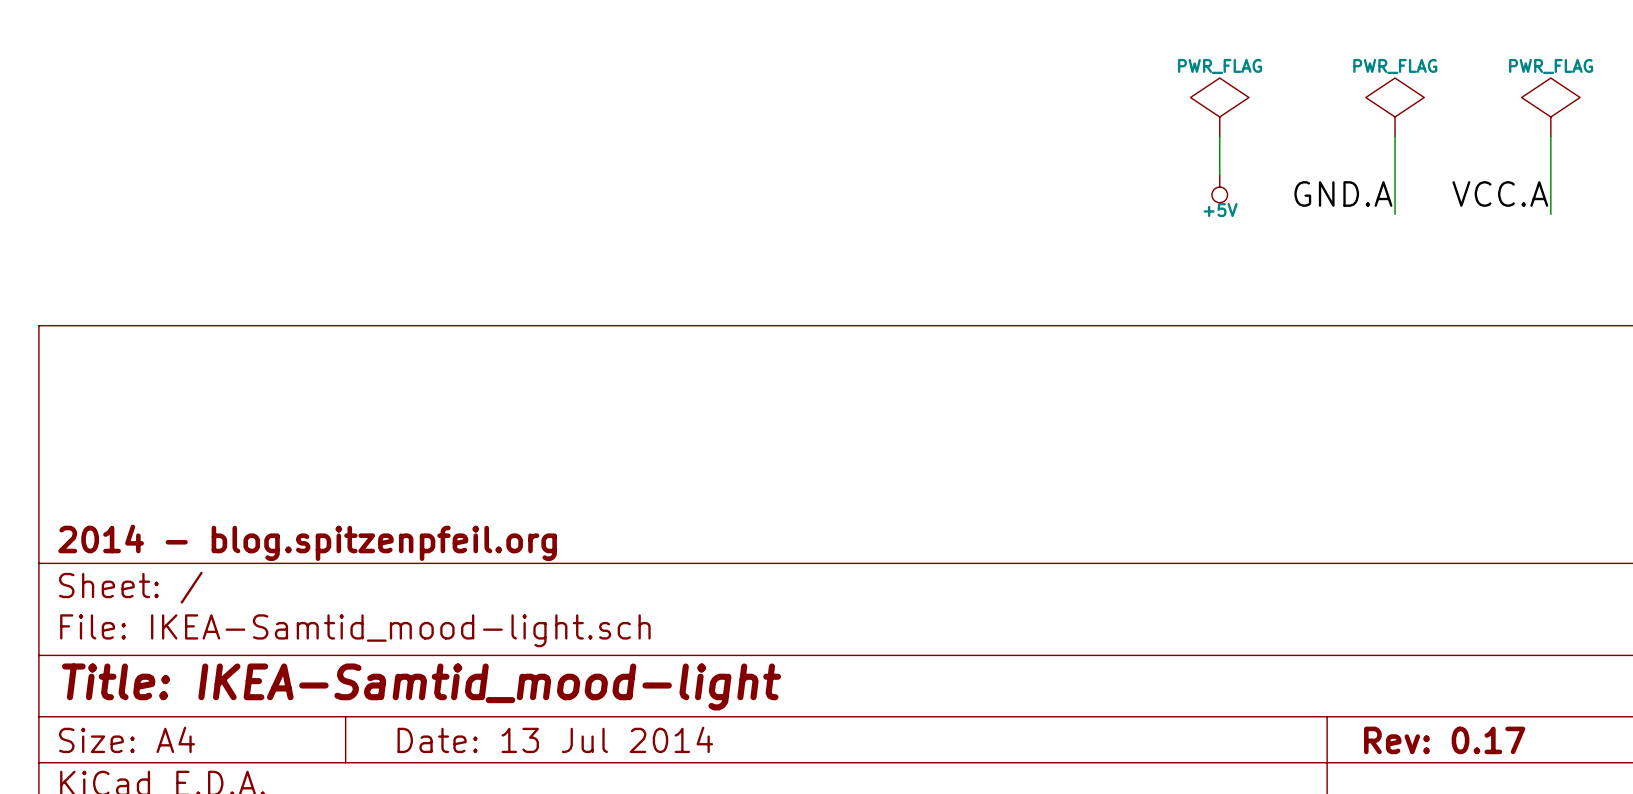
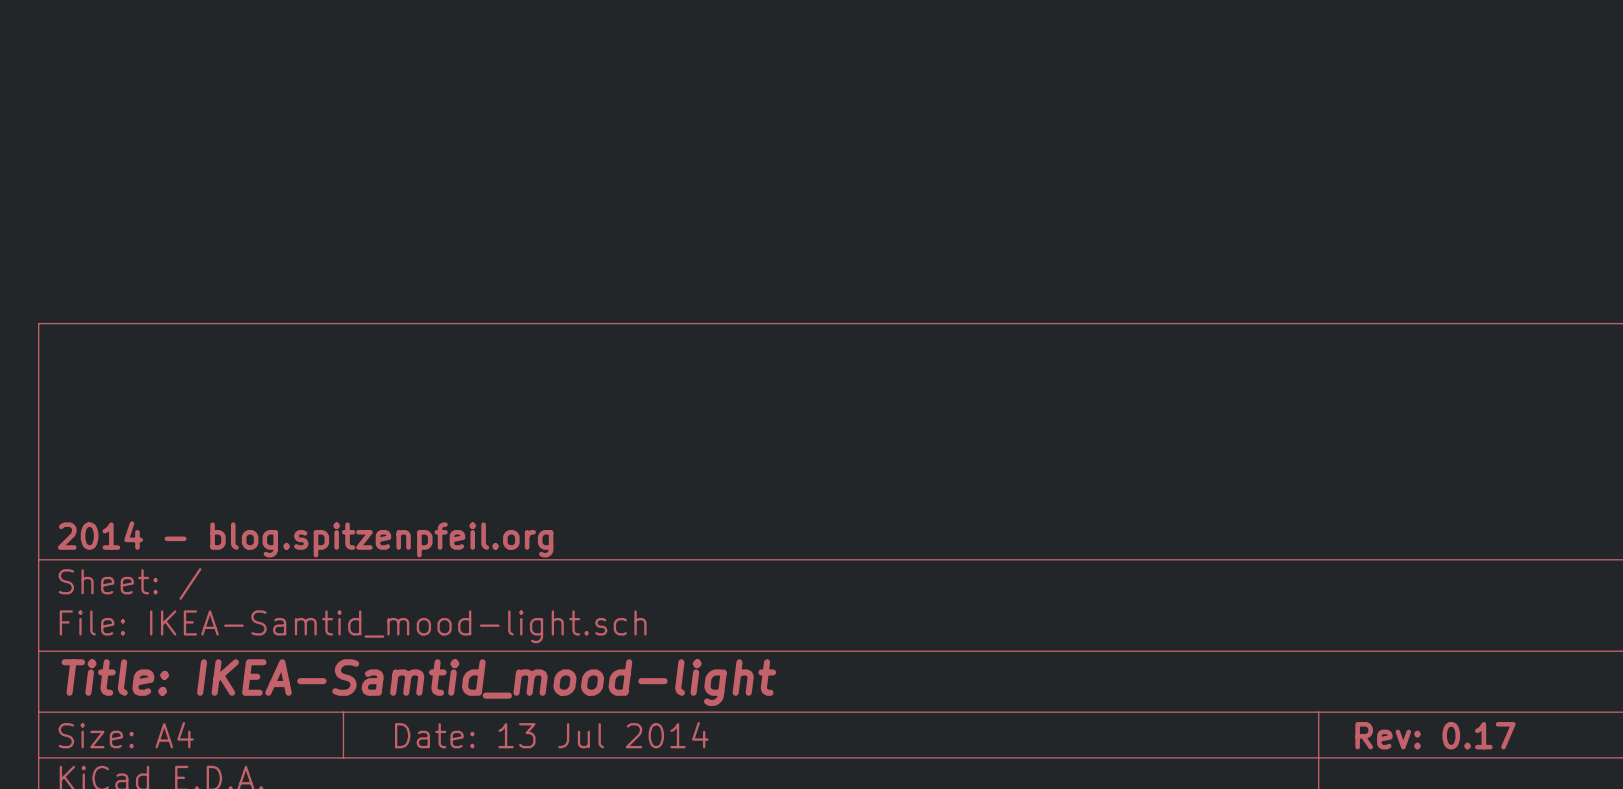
power symbol: PWR_FLAG (1219, 107) -> none
power symbol: PWR_FLAG (1395, 107) -> none
power symbol: PWR_FLAG (1550, 107) -> none
wire: (1219, 136) (1219, 175) -> none
wire: (1395, 136) (1395, 214) -> none
wire: (1550, 136) (1550, 214) -> none
power symbol: +5V (1219, 189) -> none
label: GND.A (1343, 193) -> none
label: VCC.A (1500, 193) -> none

